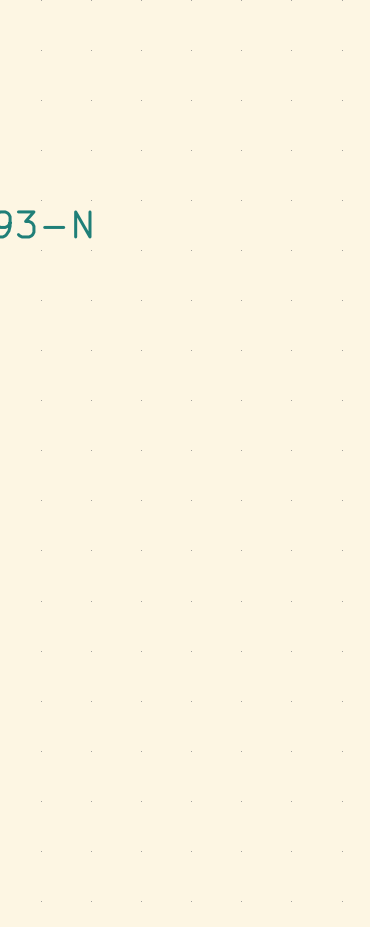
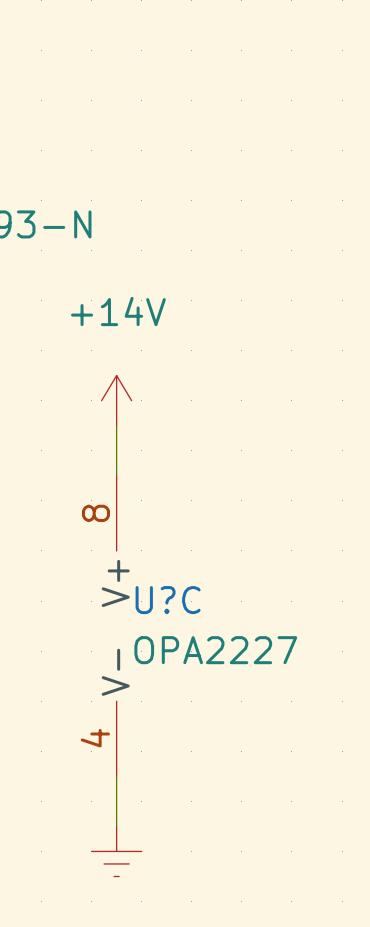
power symbol: none -> +14V (116, 400)
wire: none -> (116, 425) (116, 475)
U?C: none -> OPA2227 (116, 626)
wire: none -> (116, 776) (116, 826)
power symbol: none -> (116, 851)

